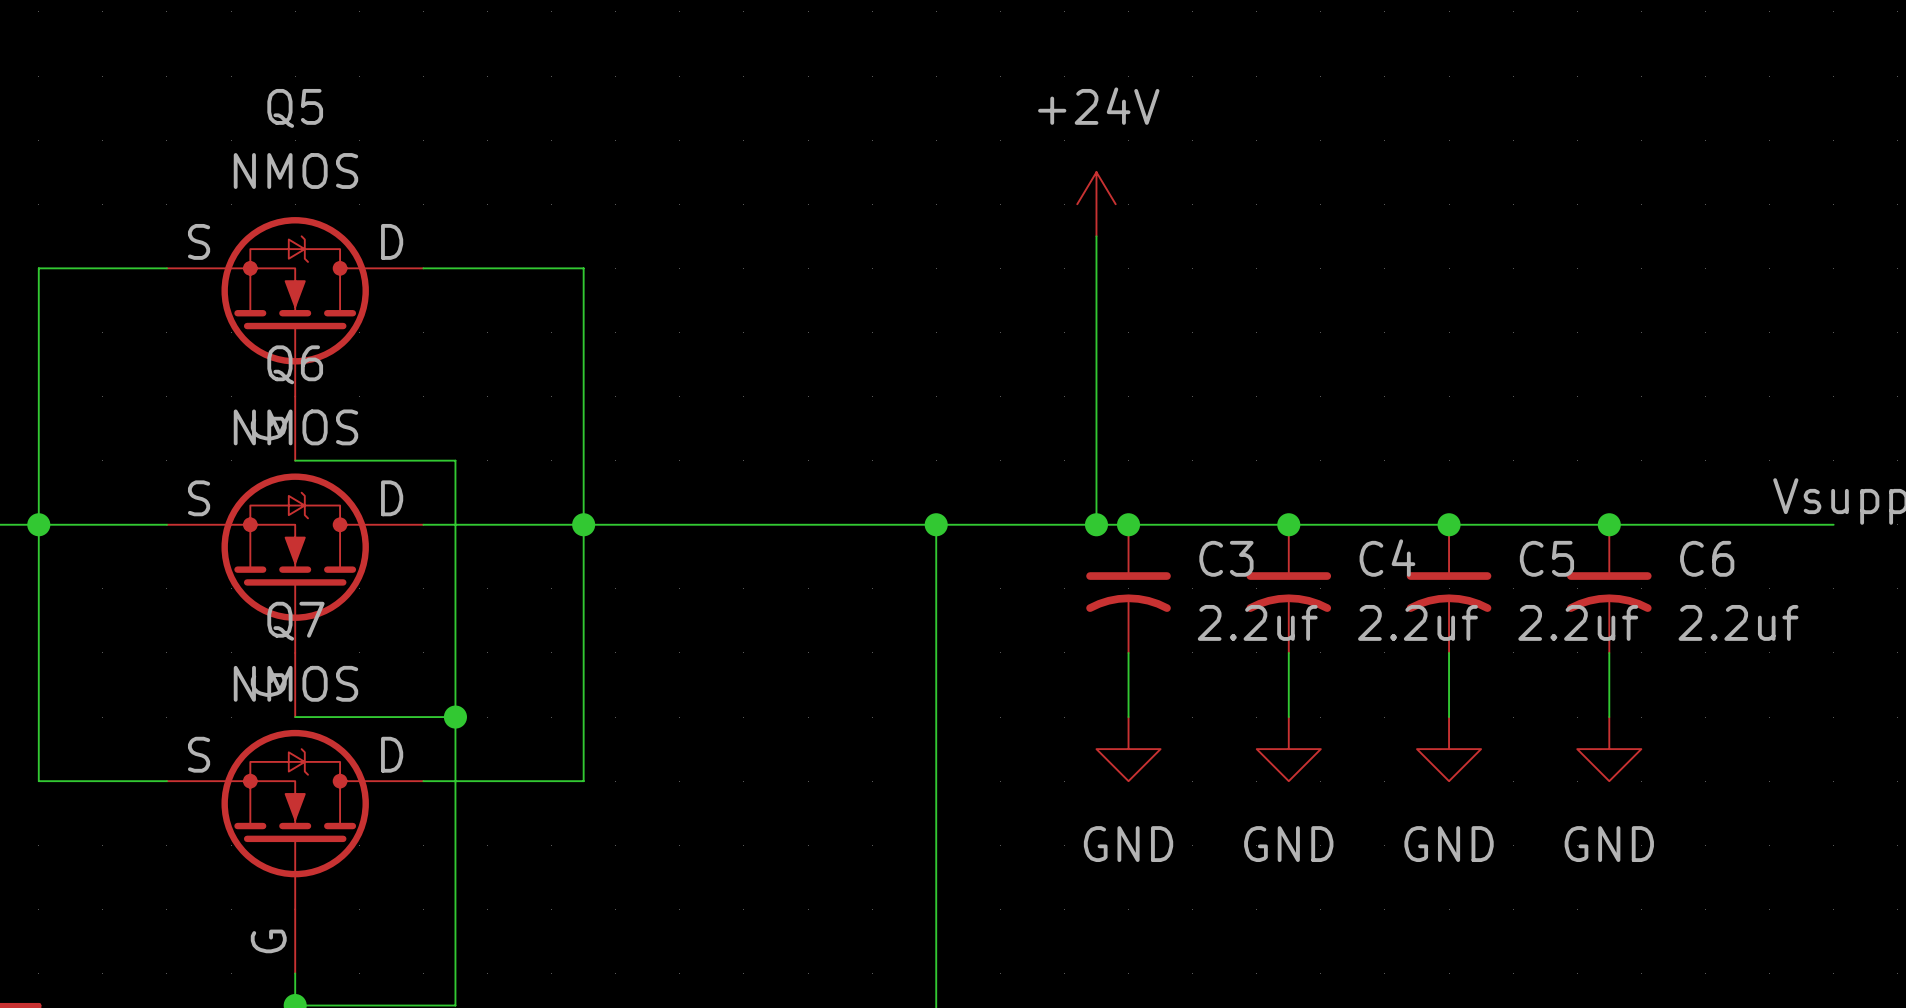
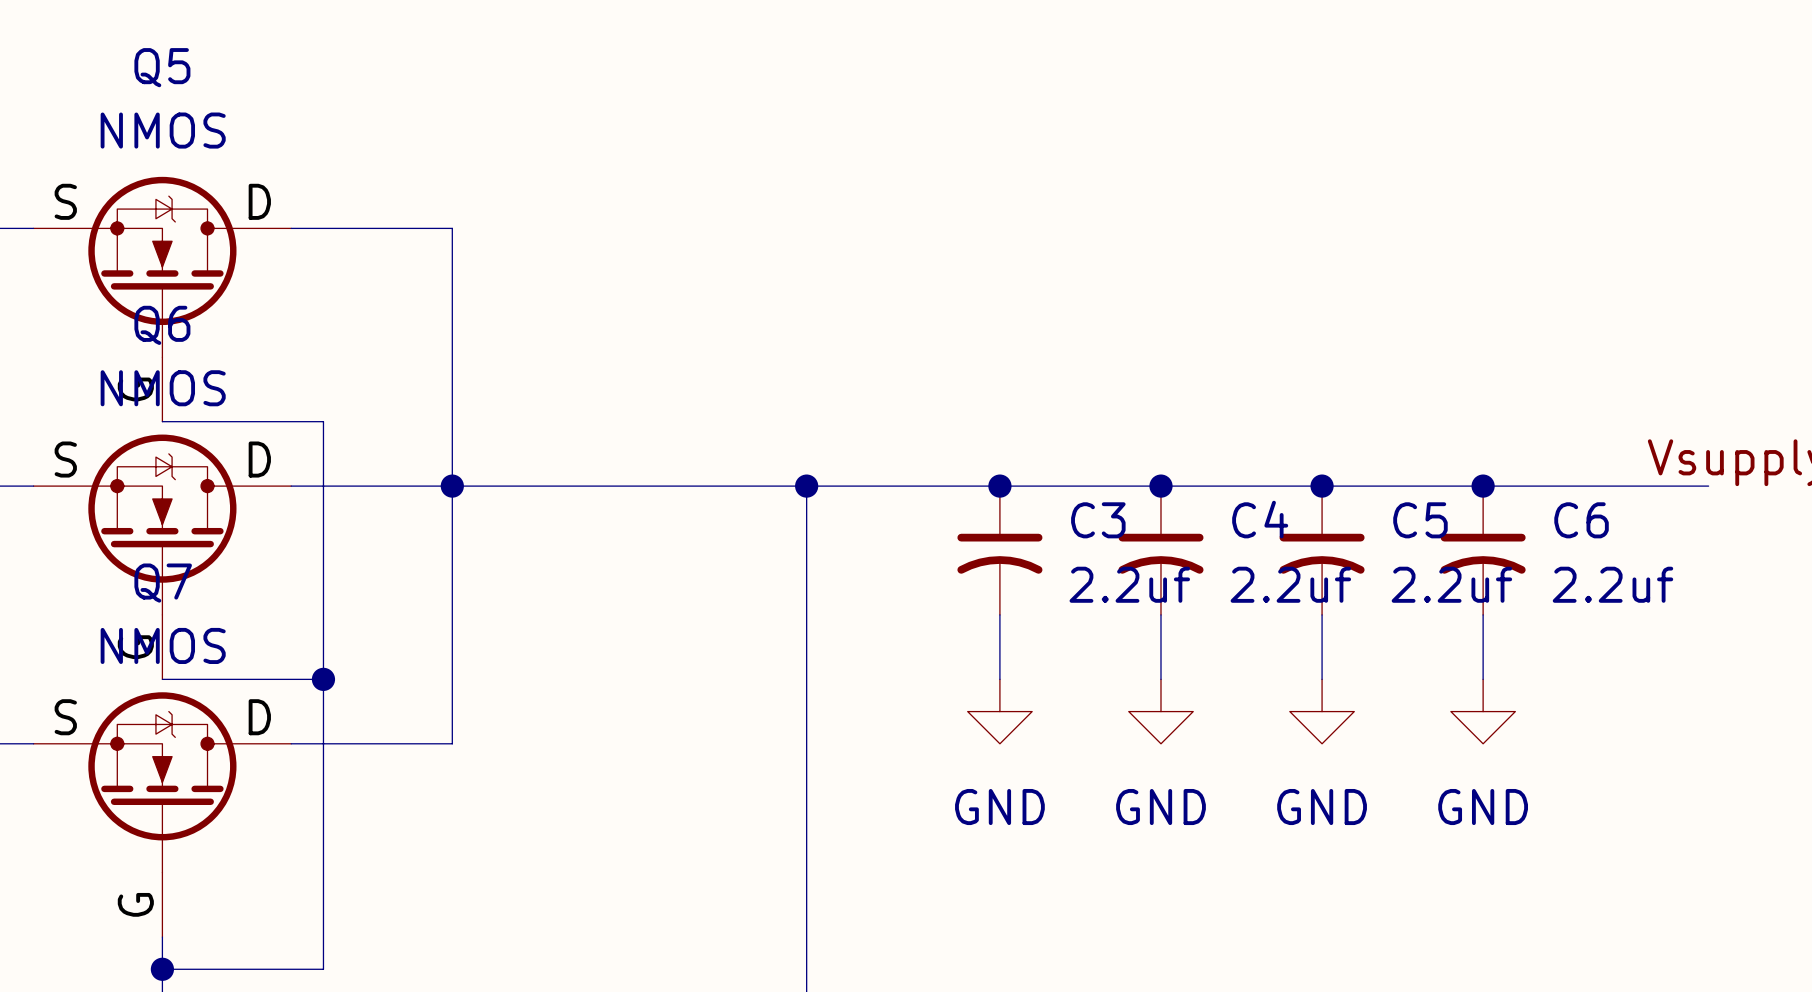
power symbol: +24V (1096, 204) -> none
wire: (1096, 236) (1096, 524) -> none
junction: (1096, 524) -> none

